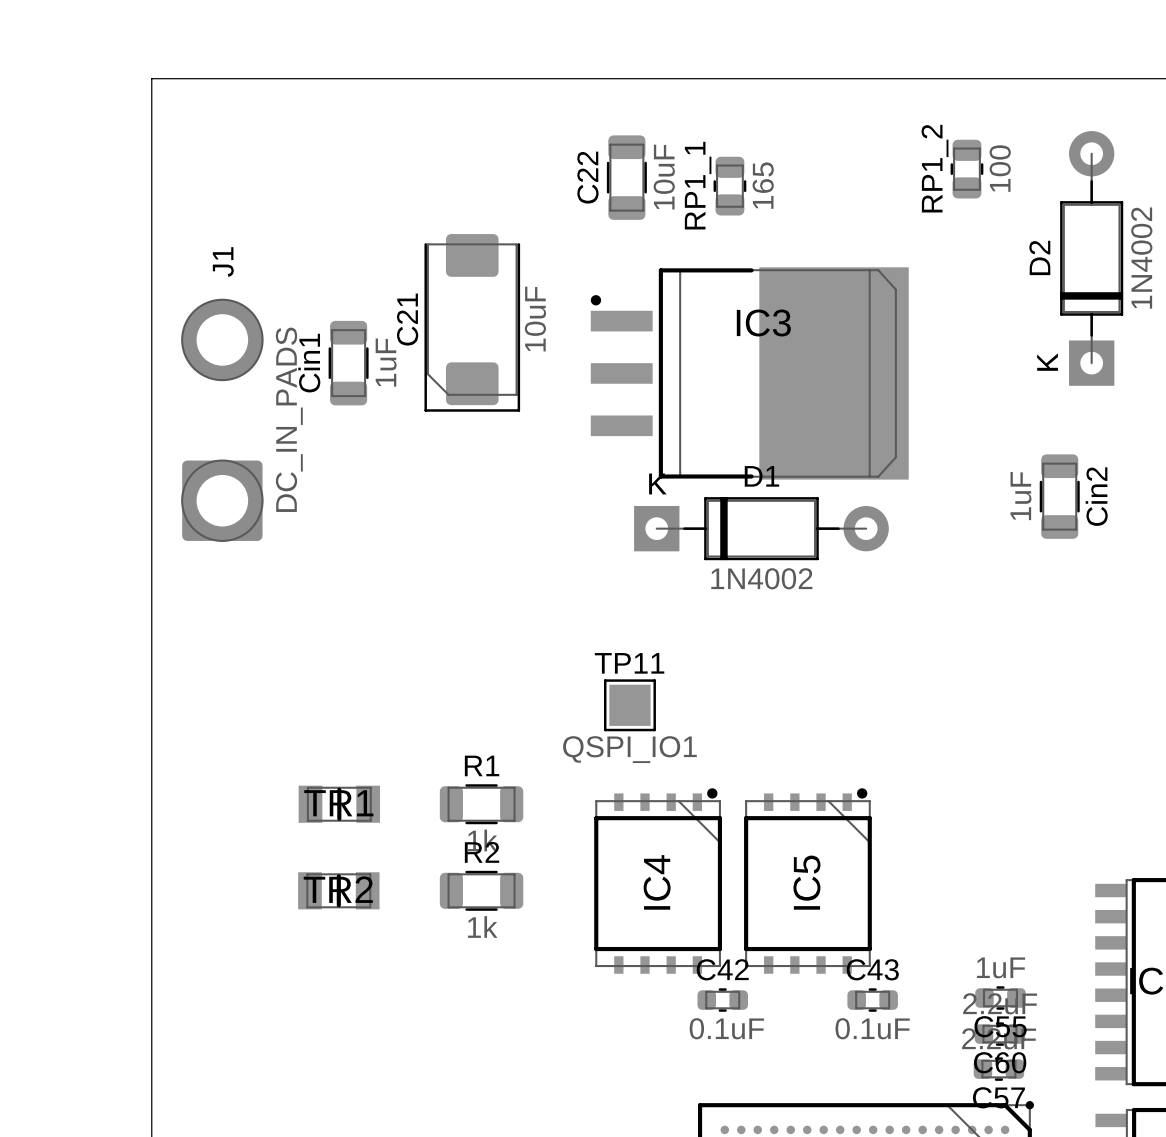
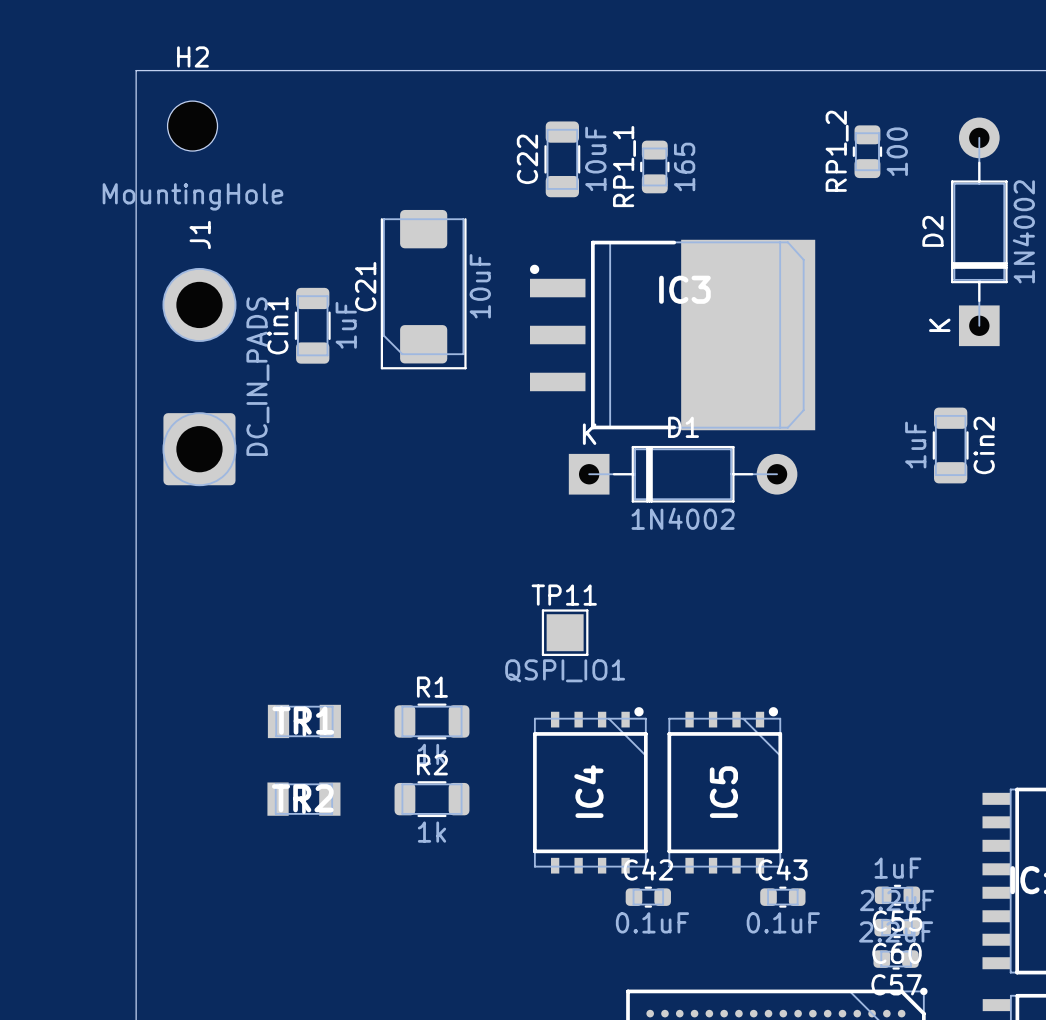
H2: none -> MountingHole (192, 126)

